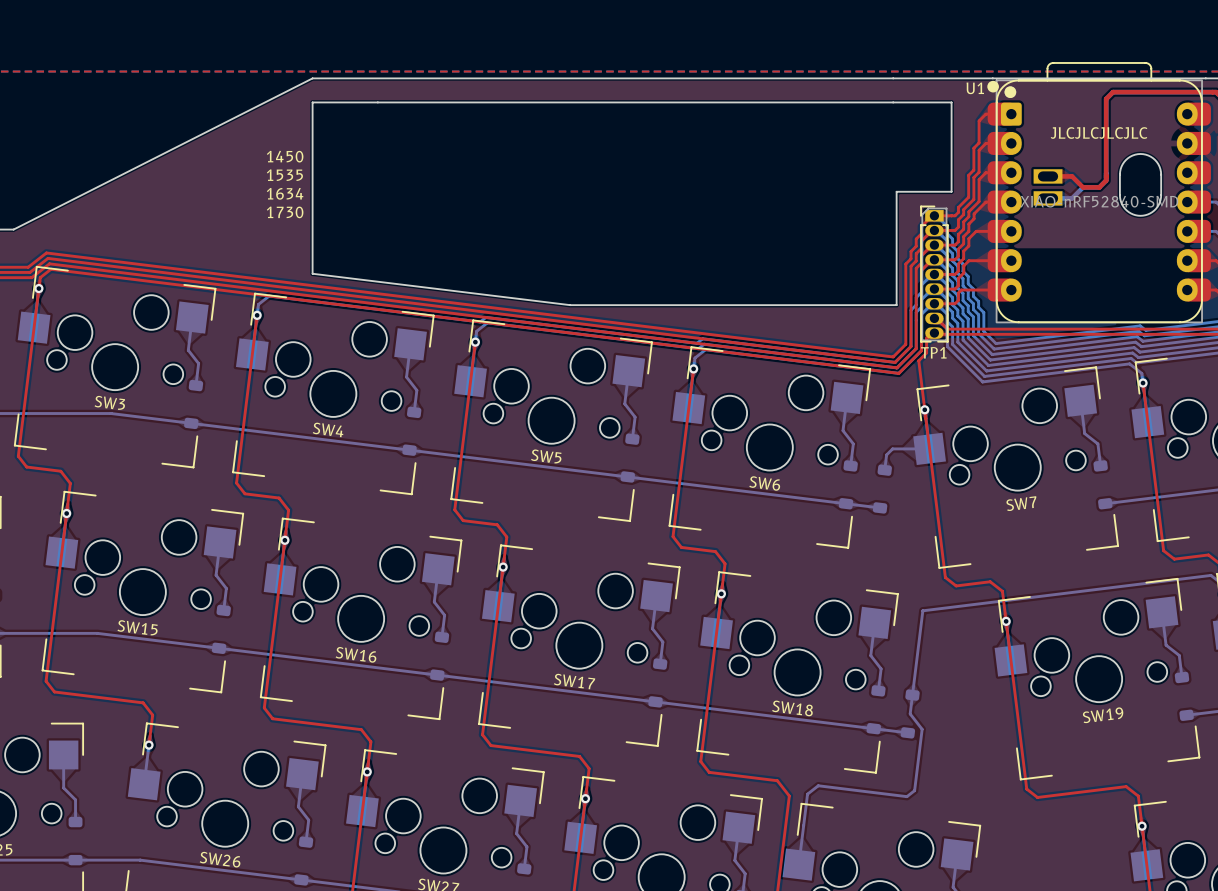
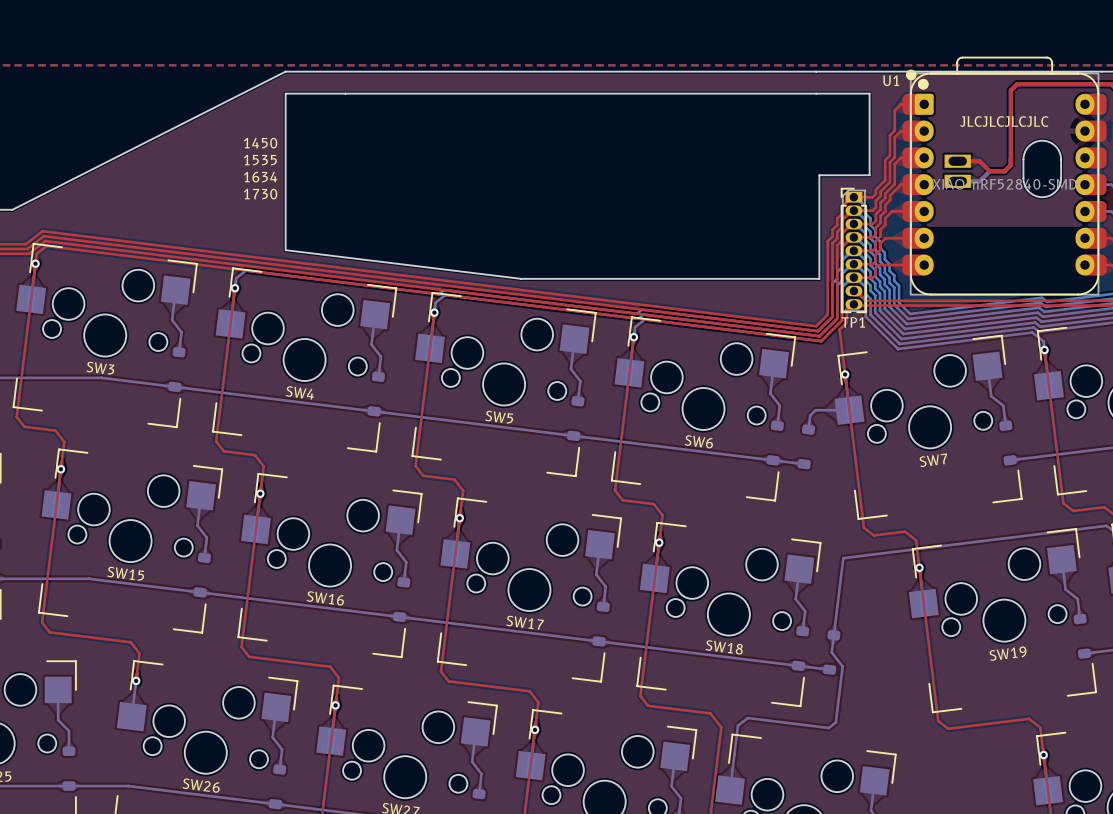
U1 footprint: [987, 62, 1211, 324] -> [902, 56, 1107, 296]

